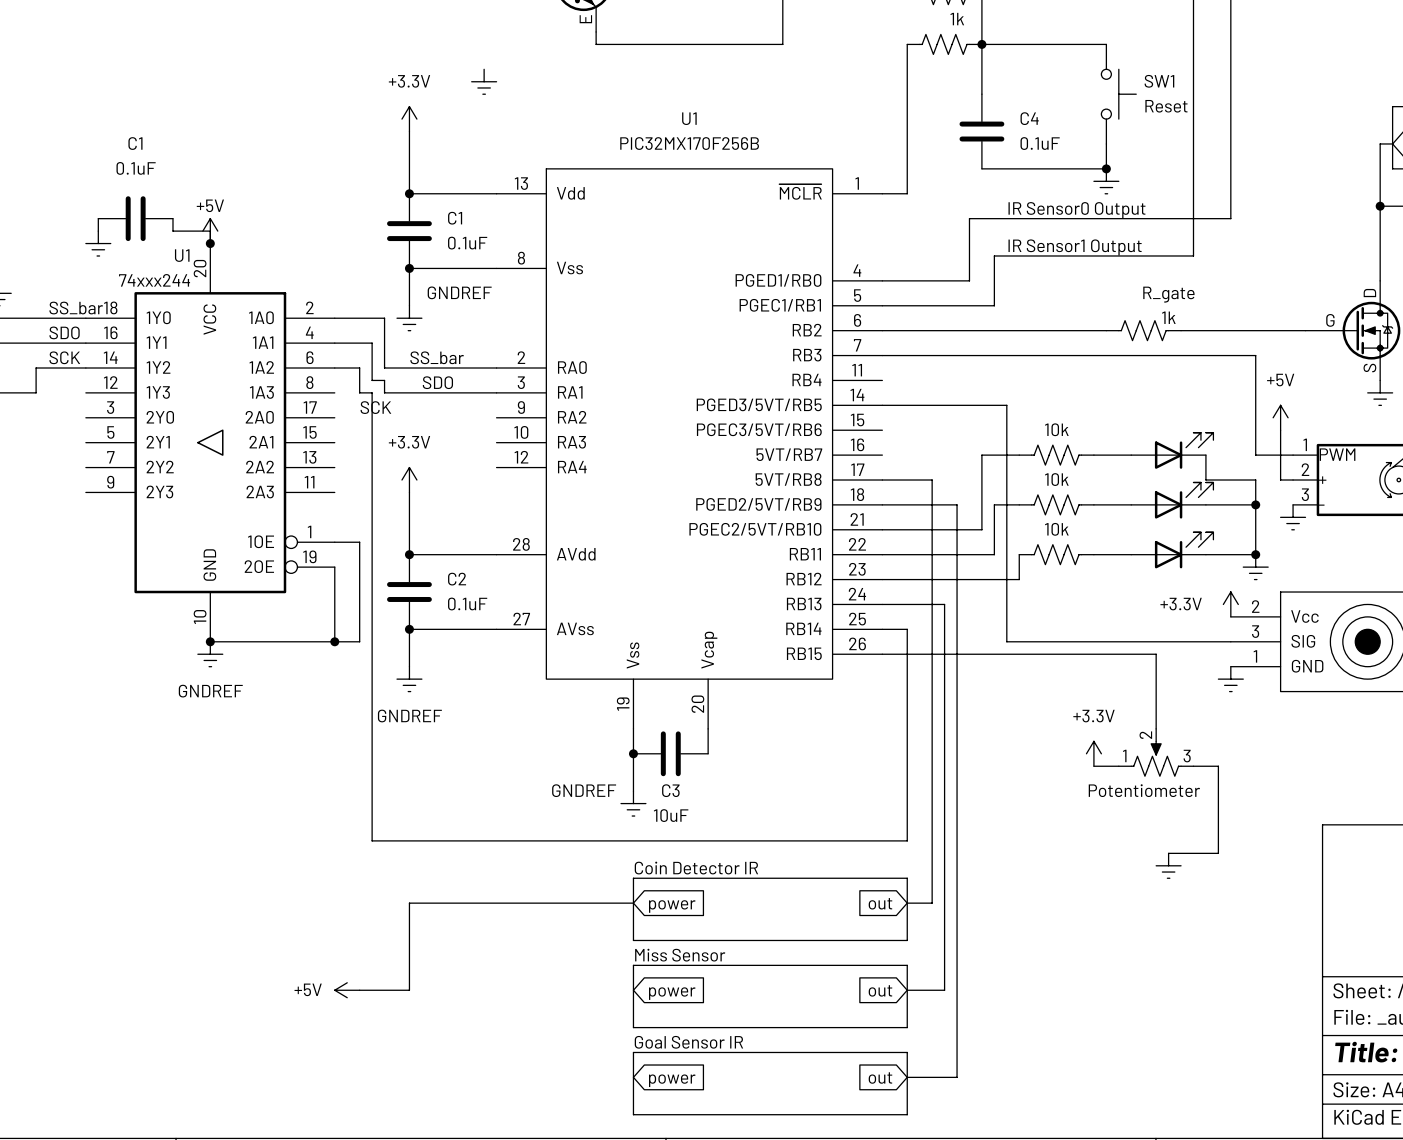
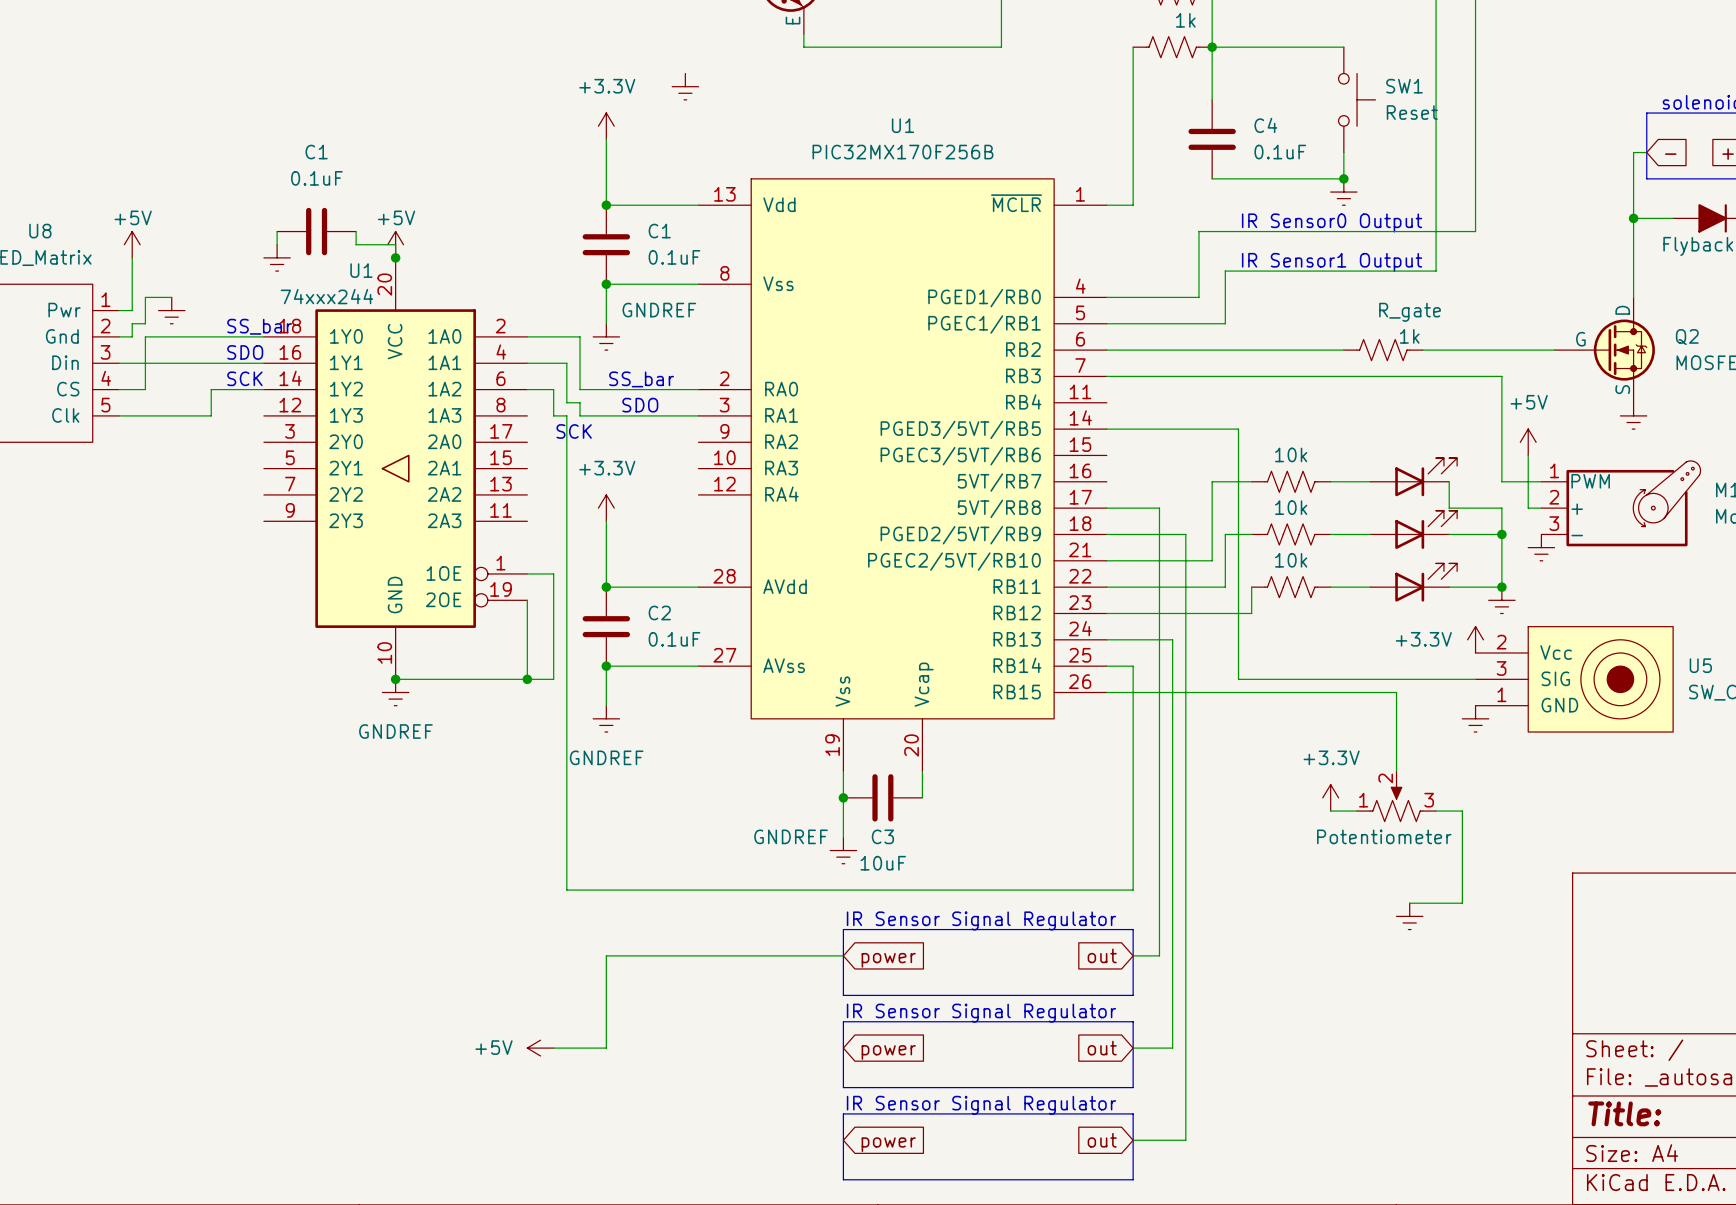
text: Coin Detector IR (696, 868) -> IR Sensor Signal Regulator (981, 920)
text: Miss Sensor (680, 955) -> IR Sensor Signal Regulator (981, 1013)
text: Goal Sensor IR (688, 1042) -> IR Sensor Signal Regulator (981, 1105)

